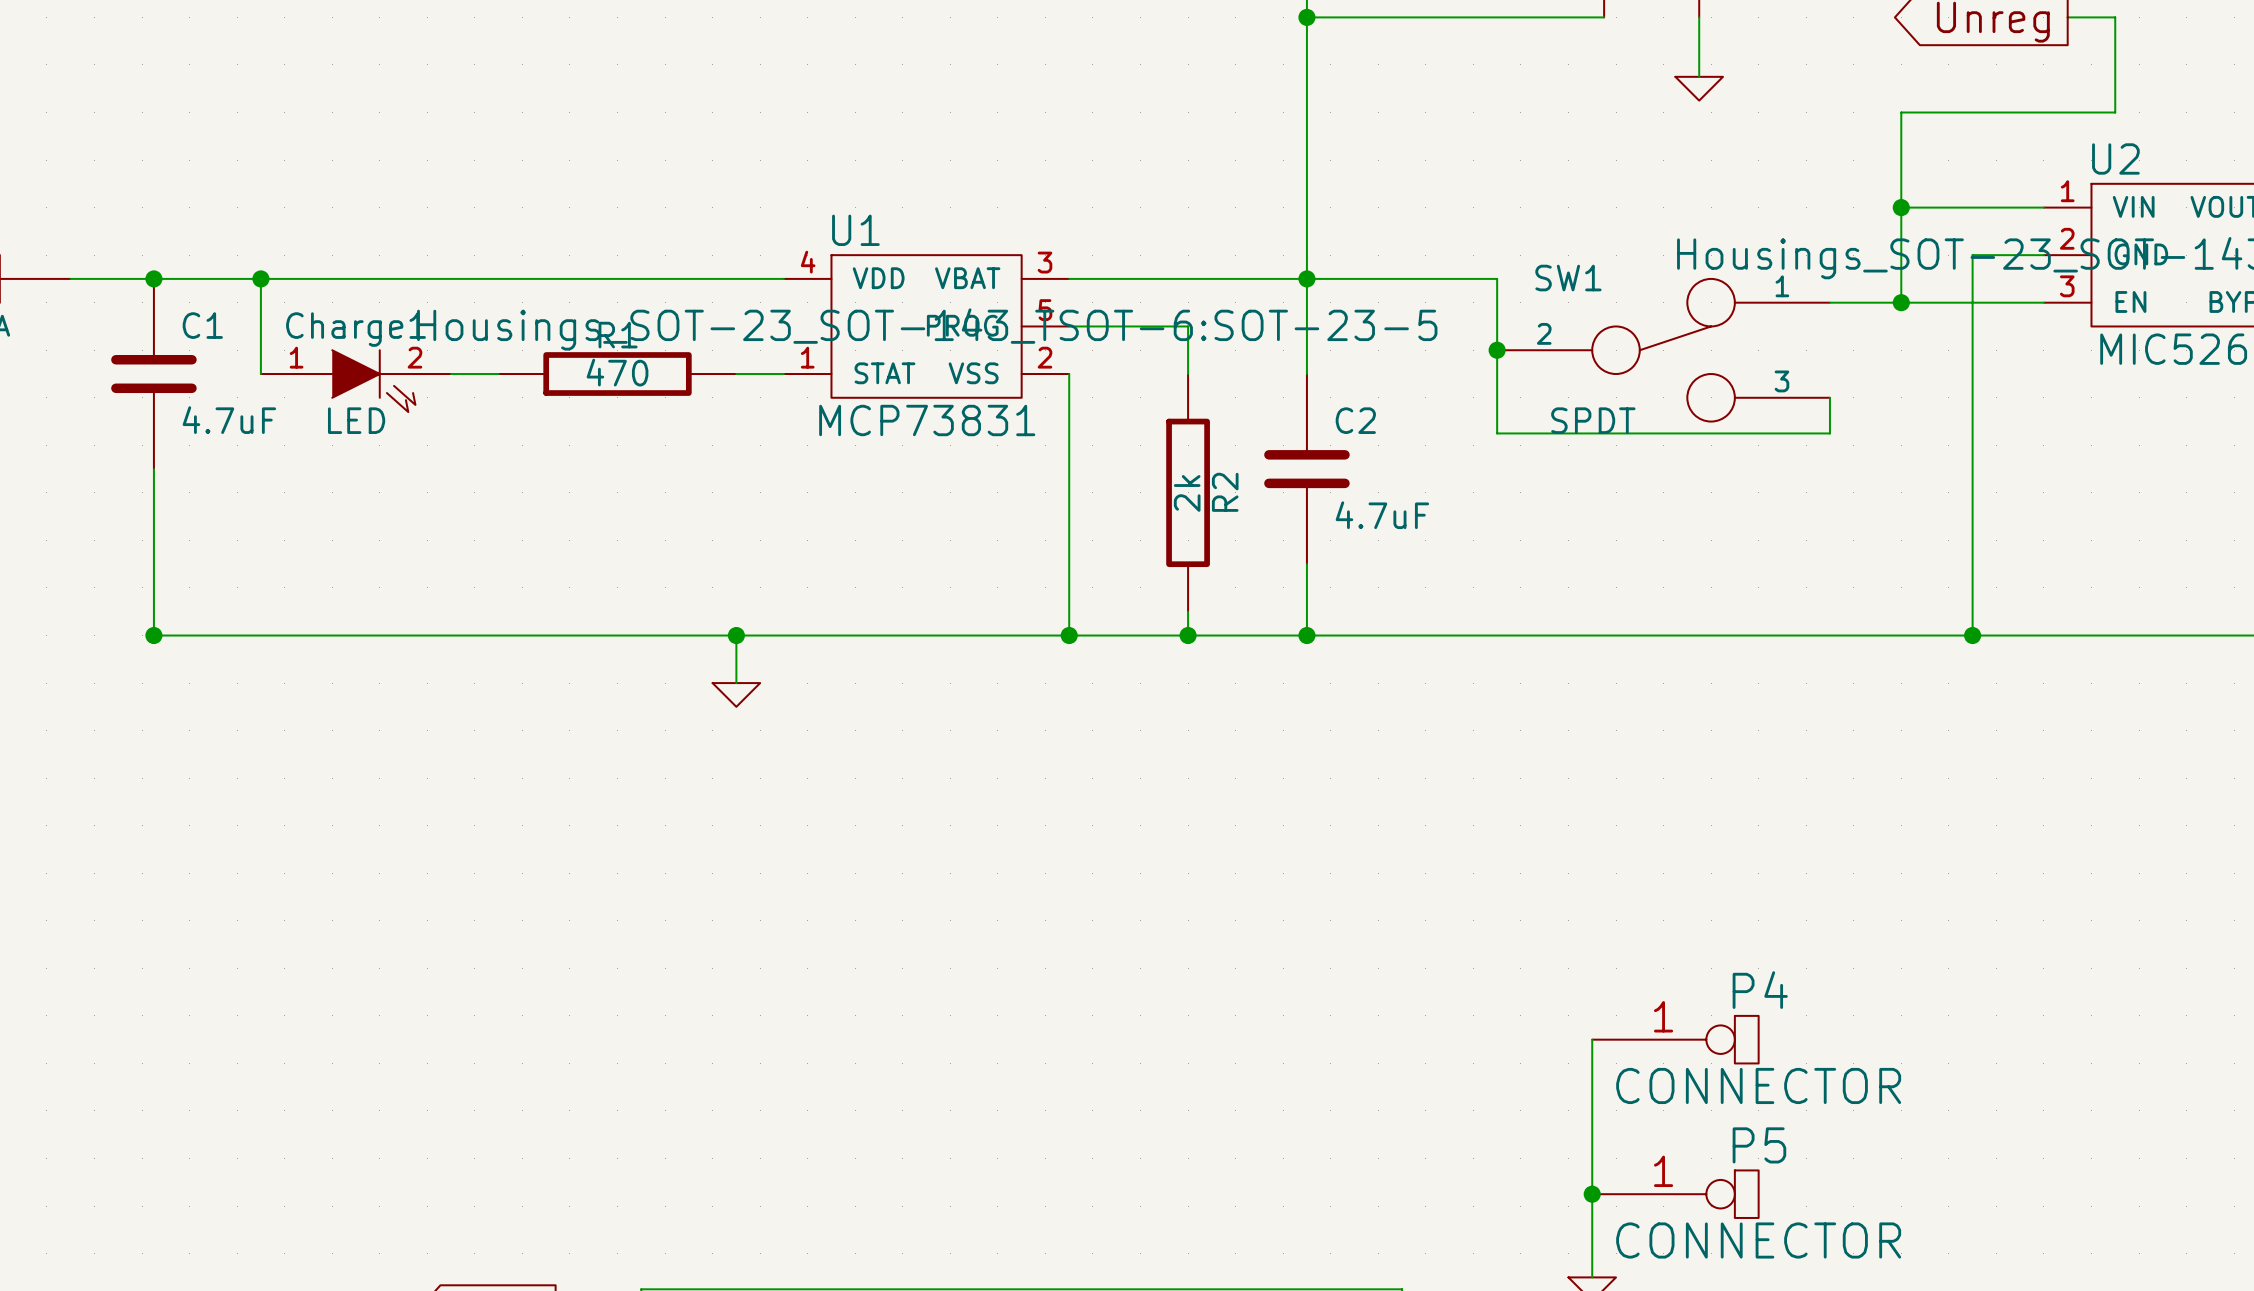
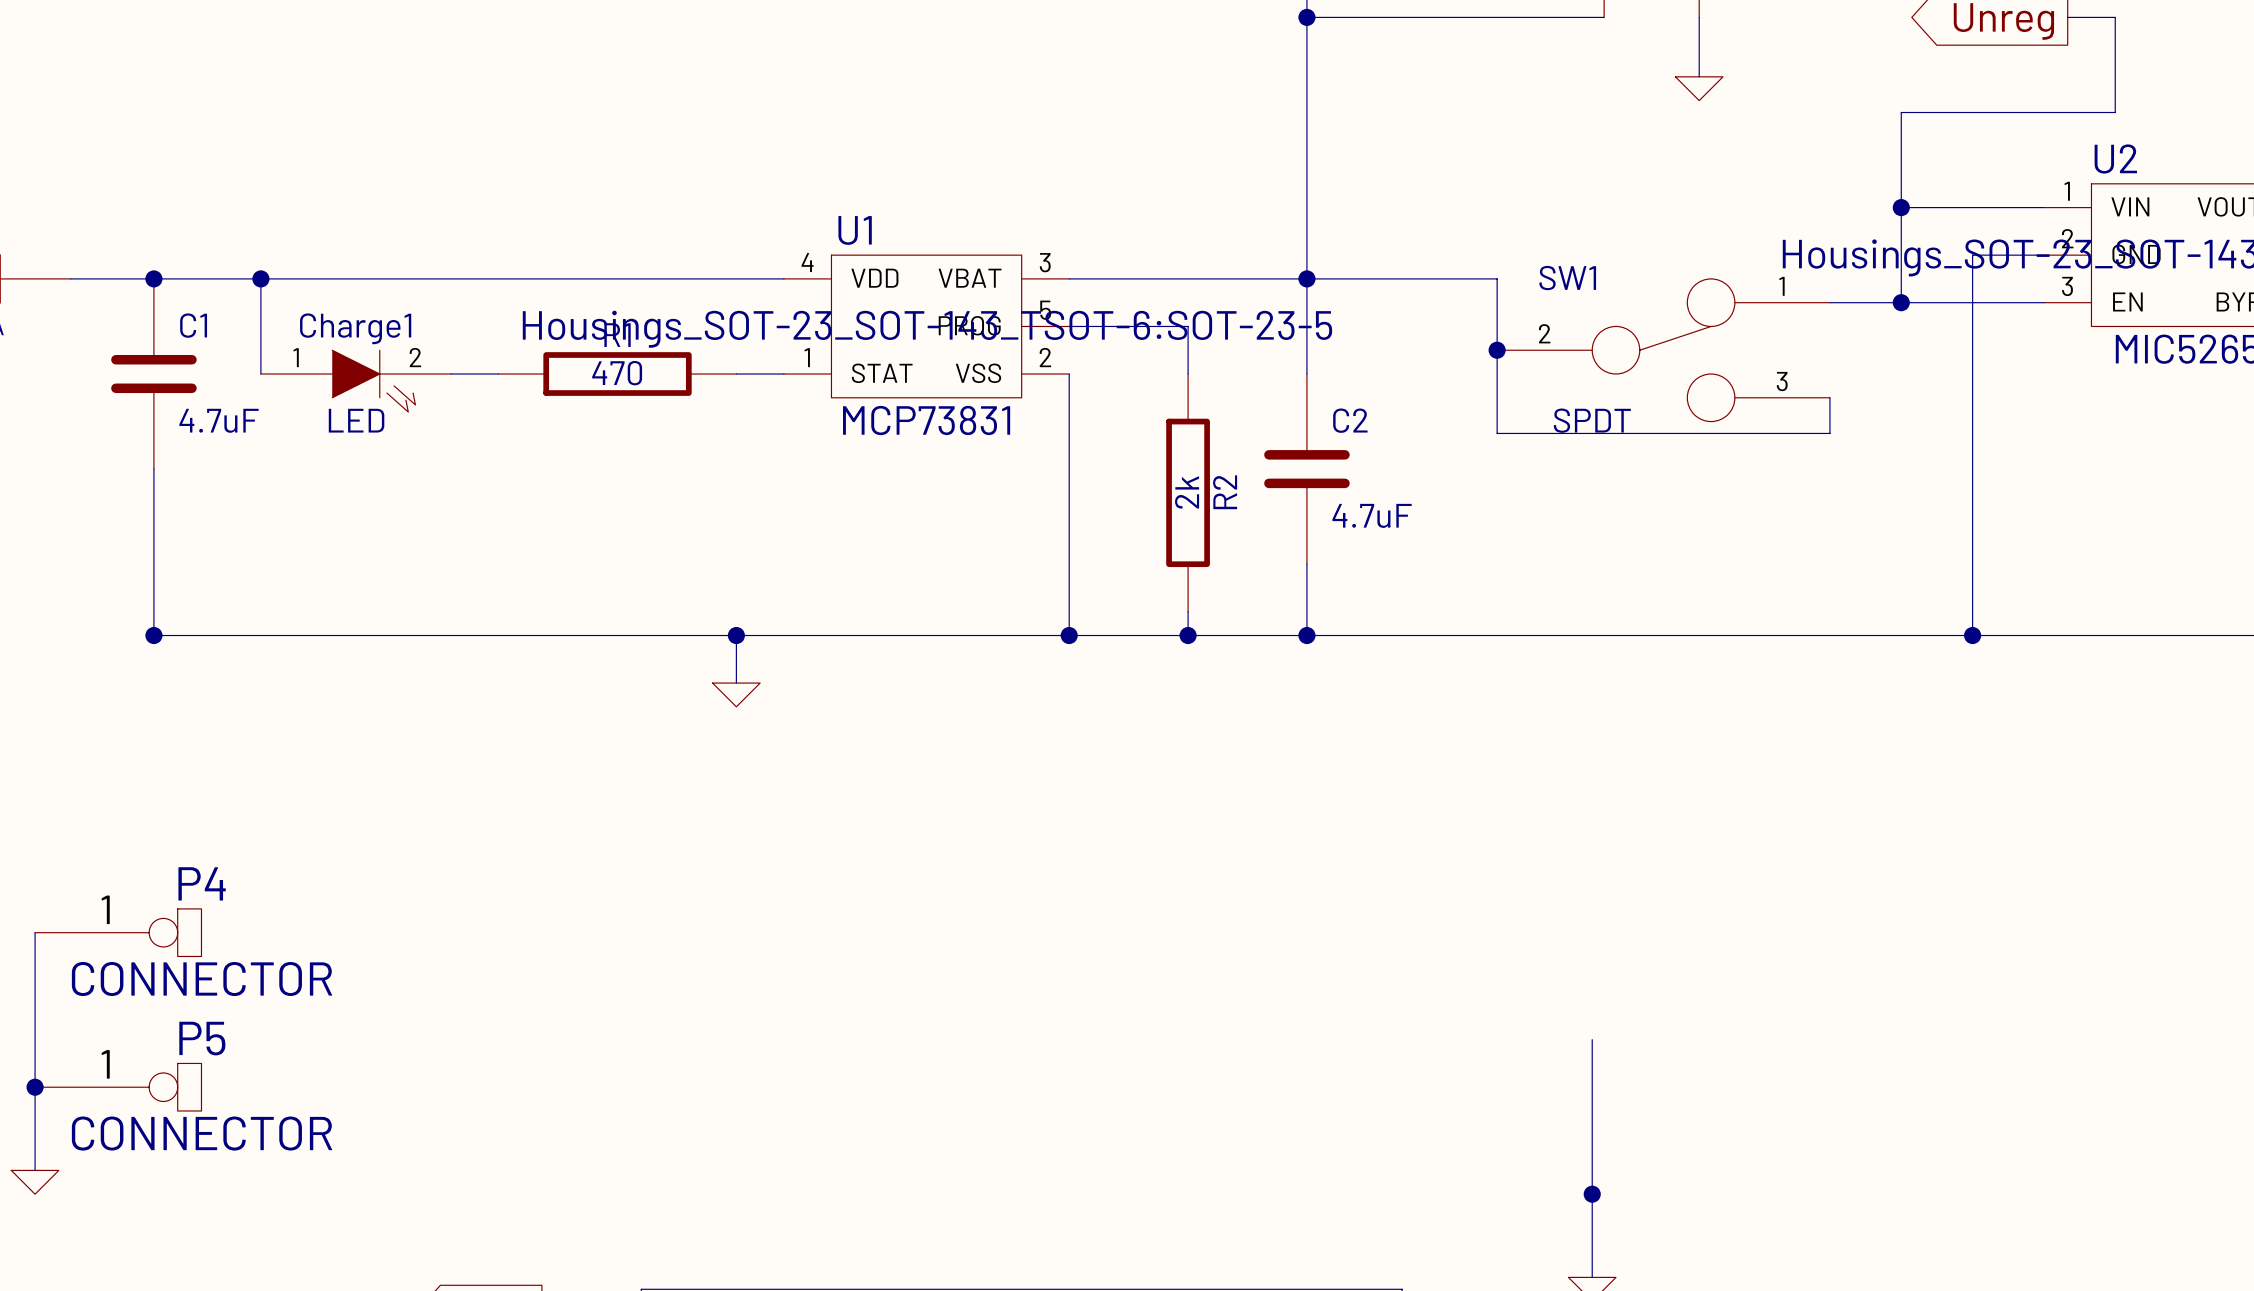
wire: none -> (35, 932) (35, 1170)
P4 position: (1675, 1039) -> (118, 932)
junction: none -> (35, 1087)
power symbol: none -> (35, 1182)
P5 position: (1675, 1194) -> (118, 1087)

